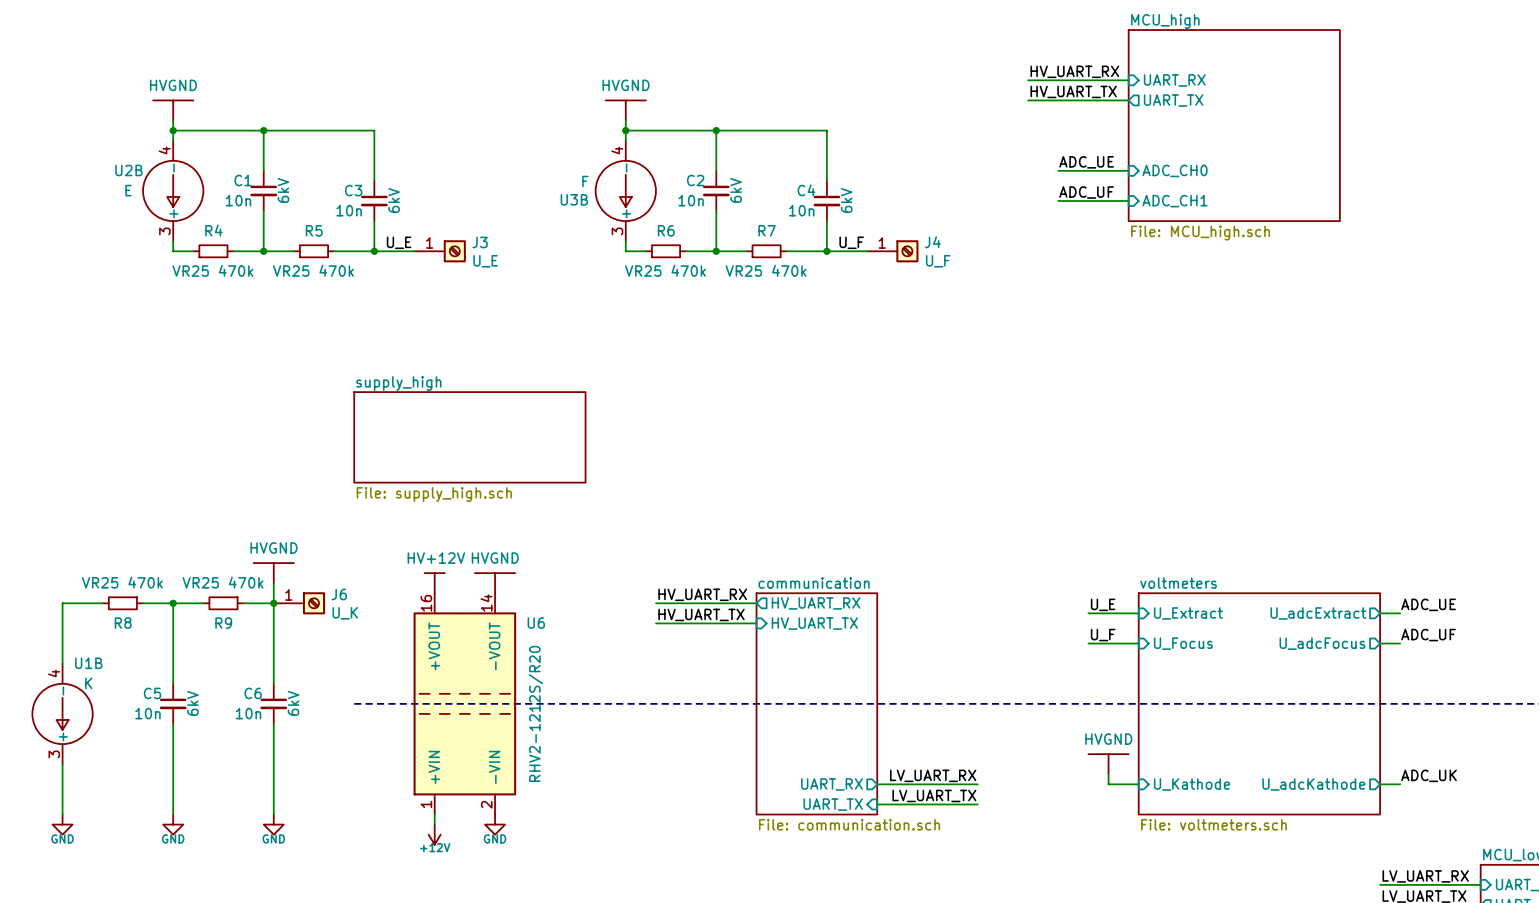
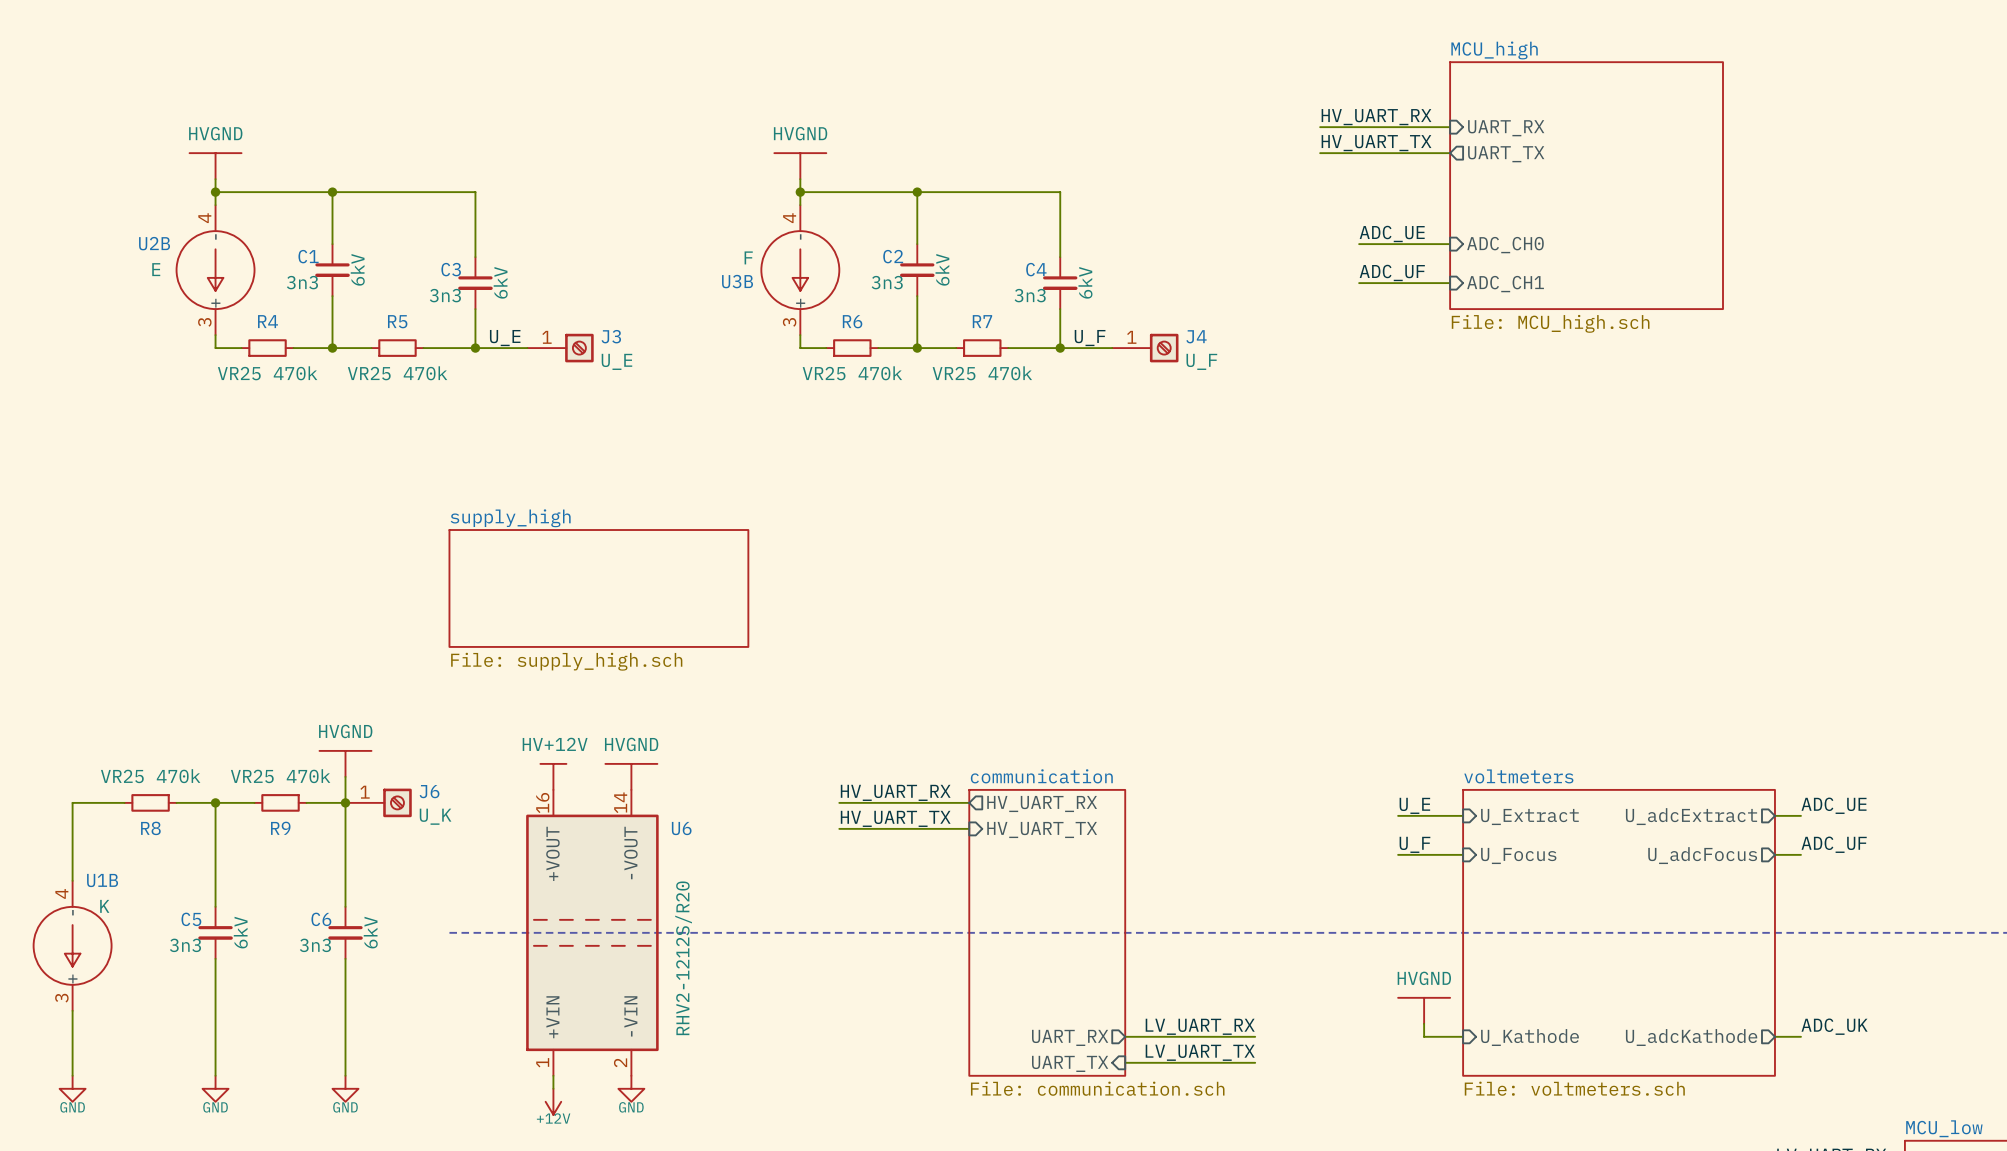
C1 value: 10n (238, 200) -> 3n3 (302, 282)
C2 value: 10n (691, 200) -> 3n3 (887, 282)
C3 value: 10n (349, 210) -> 3n3 (445, 295)
C4 value: 10n (801, 210) -> 3n3 (1030, 295)
C5 value: 10n (147, 713) -> 3n3 (185, 945)
C6 value: 10n (248, 713) -> 3n3 (315, 945)

